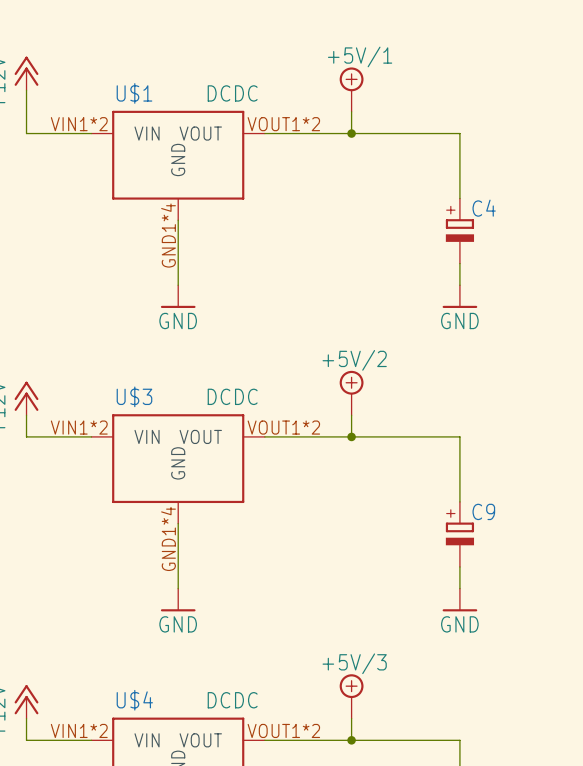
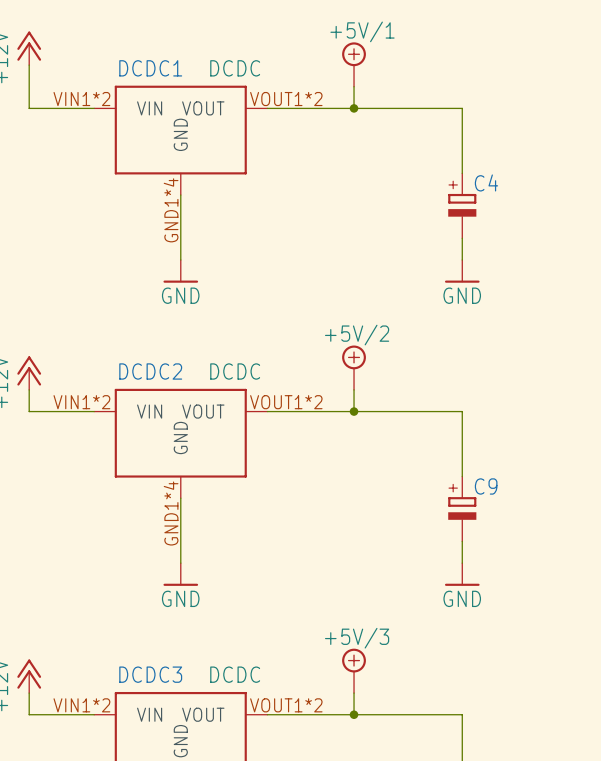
U$1 name: U$1 (134, 93) -> DCDC1 (150, 68)
U$3 name: U$3 (134, 396) -> DCDC2 (150, 371)
U$4 name: U$4 (134, 700) -> DCDC3 (150, 674)

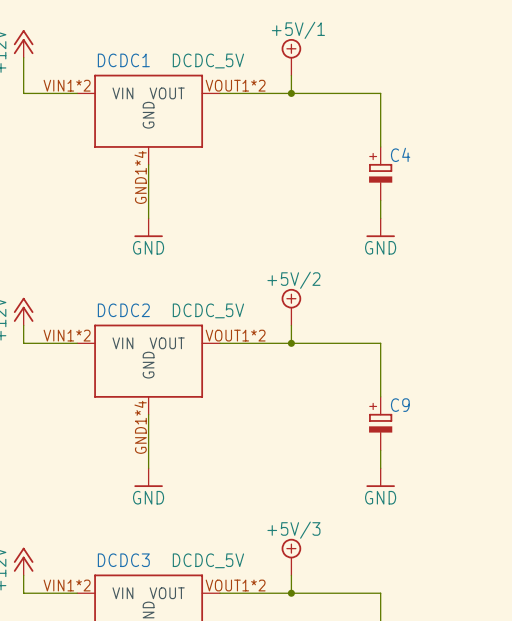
DCDC1 value: DCDC (235, 68) -> DCDC_5V (208, 60)
DCDC2 value: DCDC (235, 371) -> DCDC_5V (208, 310)
DCDC3 value: DCDC (235, 674) -> DCDC_5V (208, 560)

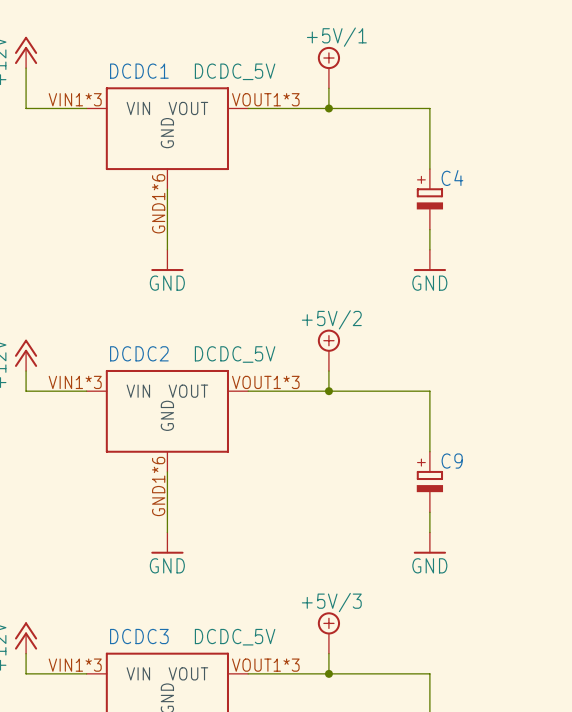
DCDC1 pin number: VIN1*2 (67, 85) -> VIN1*3 (75, 99)
DCDC1 pin number: VOUT1*2 (235, 85) -> VOUT1*3 (265, 99)
DCDC1 pin number: GND1*4 (140, 177) -> GND1*6 (158, 203)
DCDC2 pin number: VIN1*2 (67, 335) -> VIN1*3 (75, 382)
DCDC2 pin number: VOUT1*2 (235, 335) -> VOUT1*3 (265, 382)
DCDC2 pin number: GND1*4 (140, 427) -> GND1*6 (158, 486)
DCDC3 pin number: VIN1*2 (67, 585) -> VIN1*3 (75, 665)
DCDC3 pin number: VOUT1*2 (235, 585) -> VOUT1*3 (265, 665)

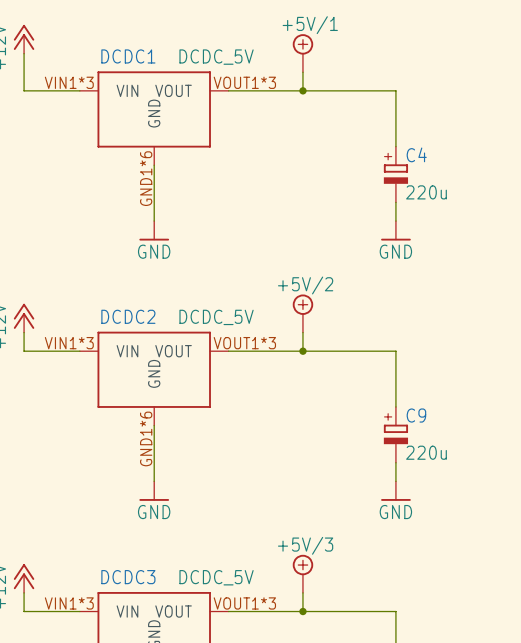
C4 value: none -> 220u (426, 192)
C9 value: none -> 220u (426, 452)

